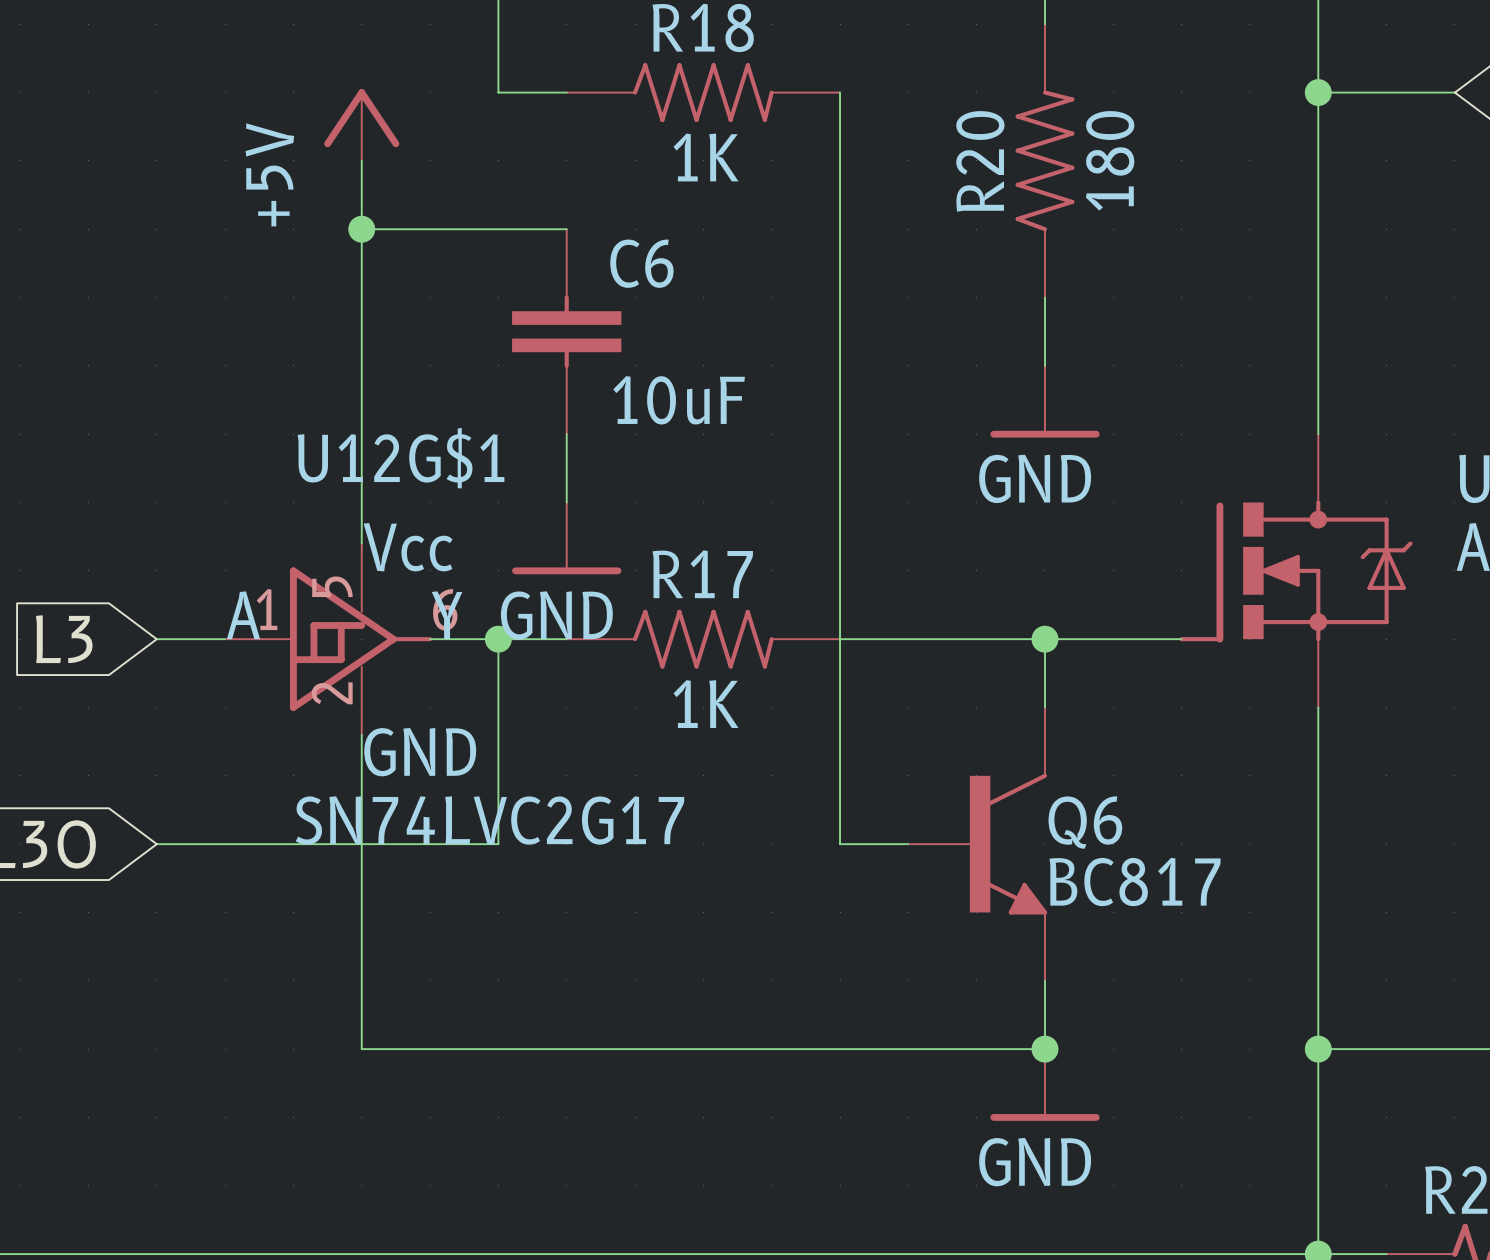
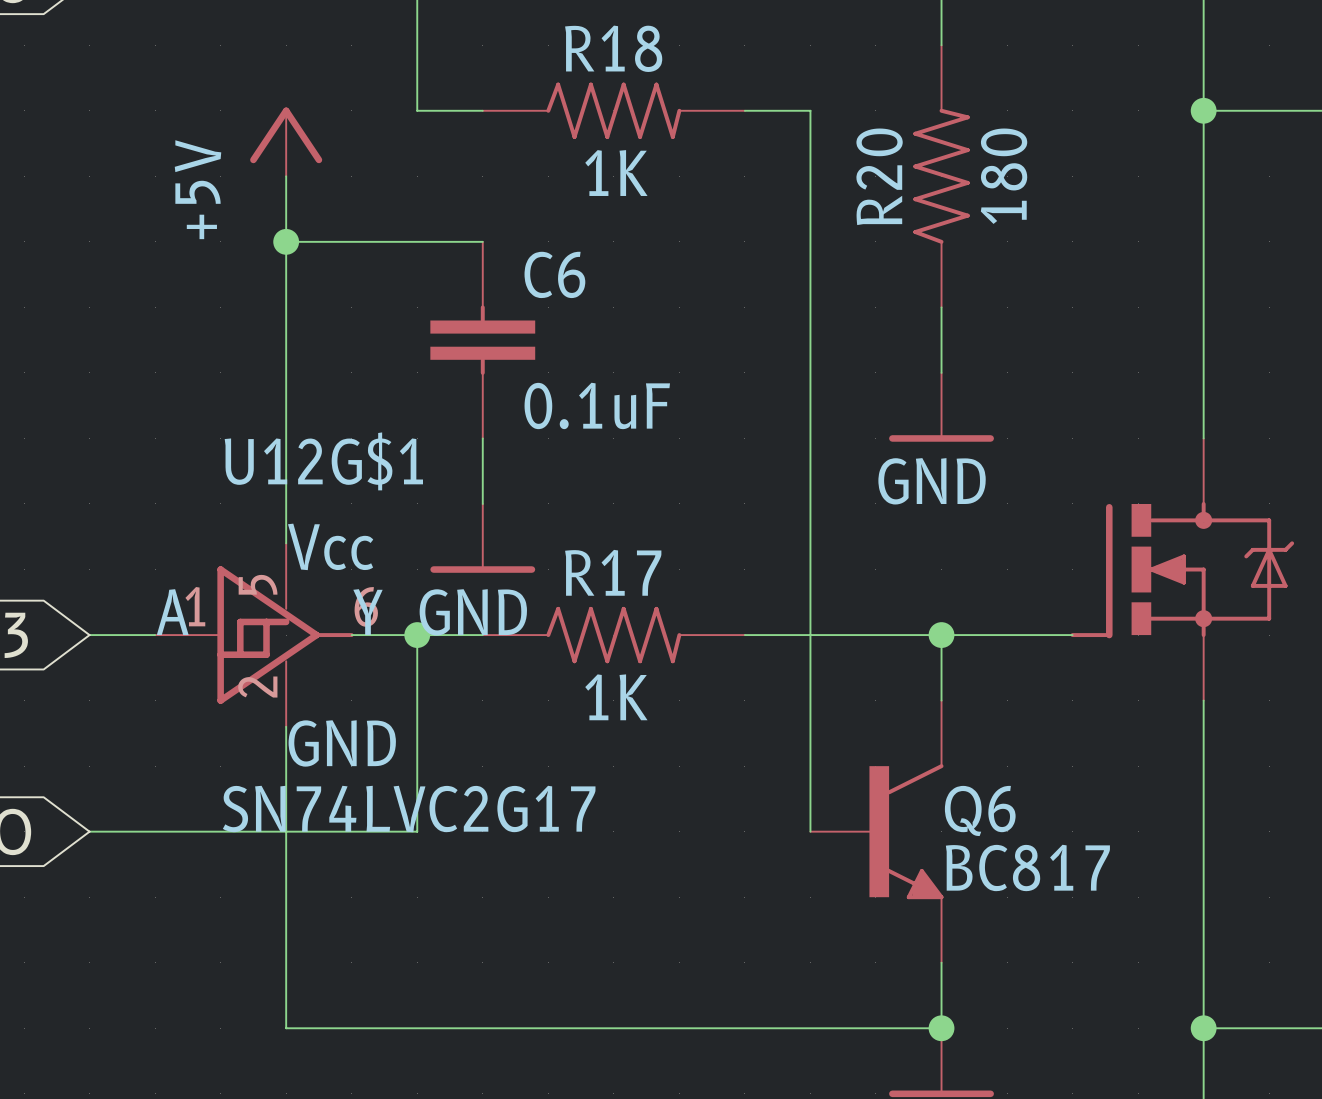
wire: (840, 92) (840, 844) (908, 844) -> (744, 110) (810, 110) (810, 831)
C6 value: 10uF (679, 400) -> 0.1uF (597, 405)

